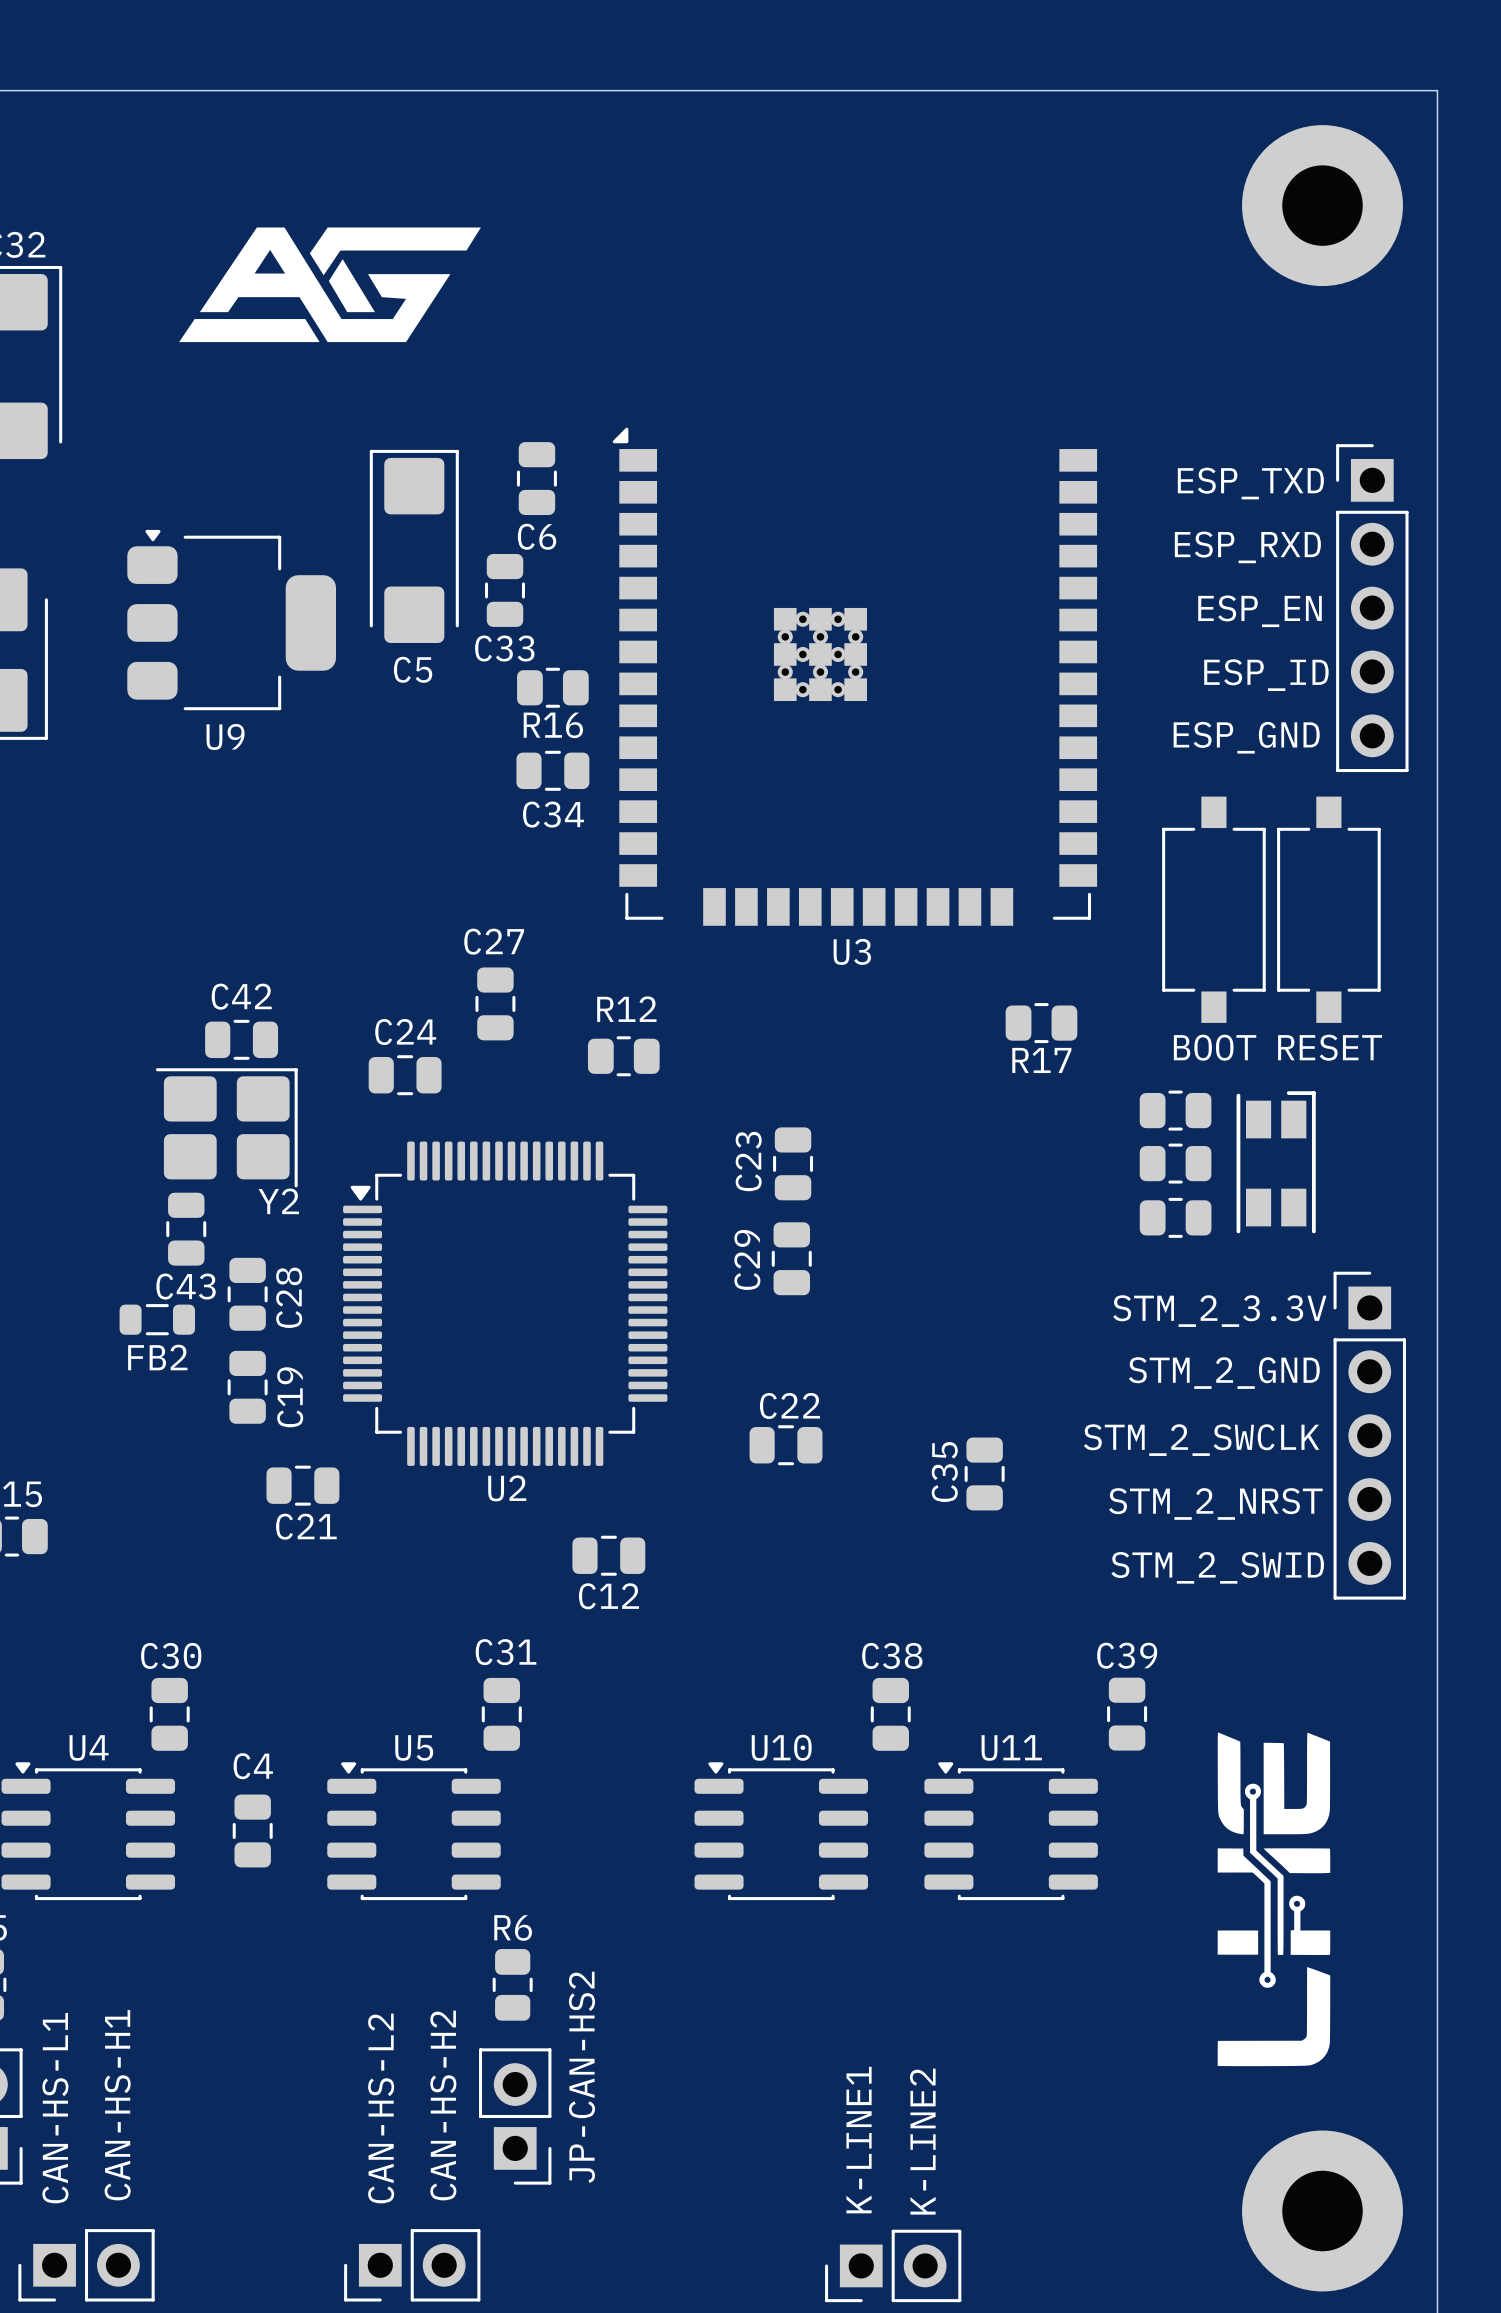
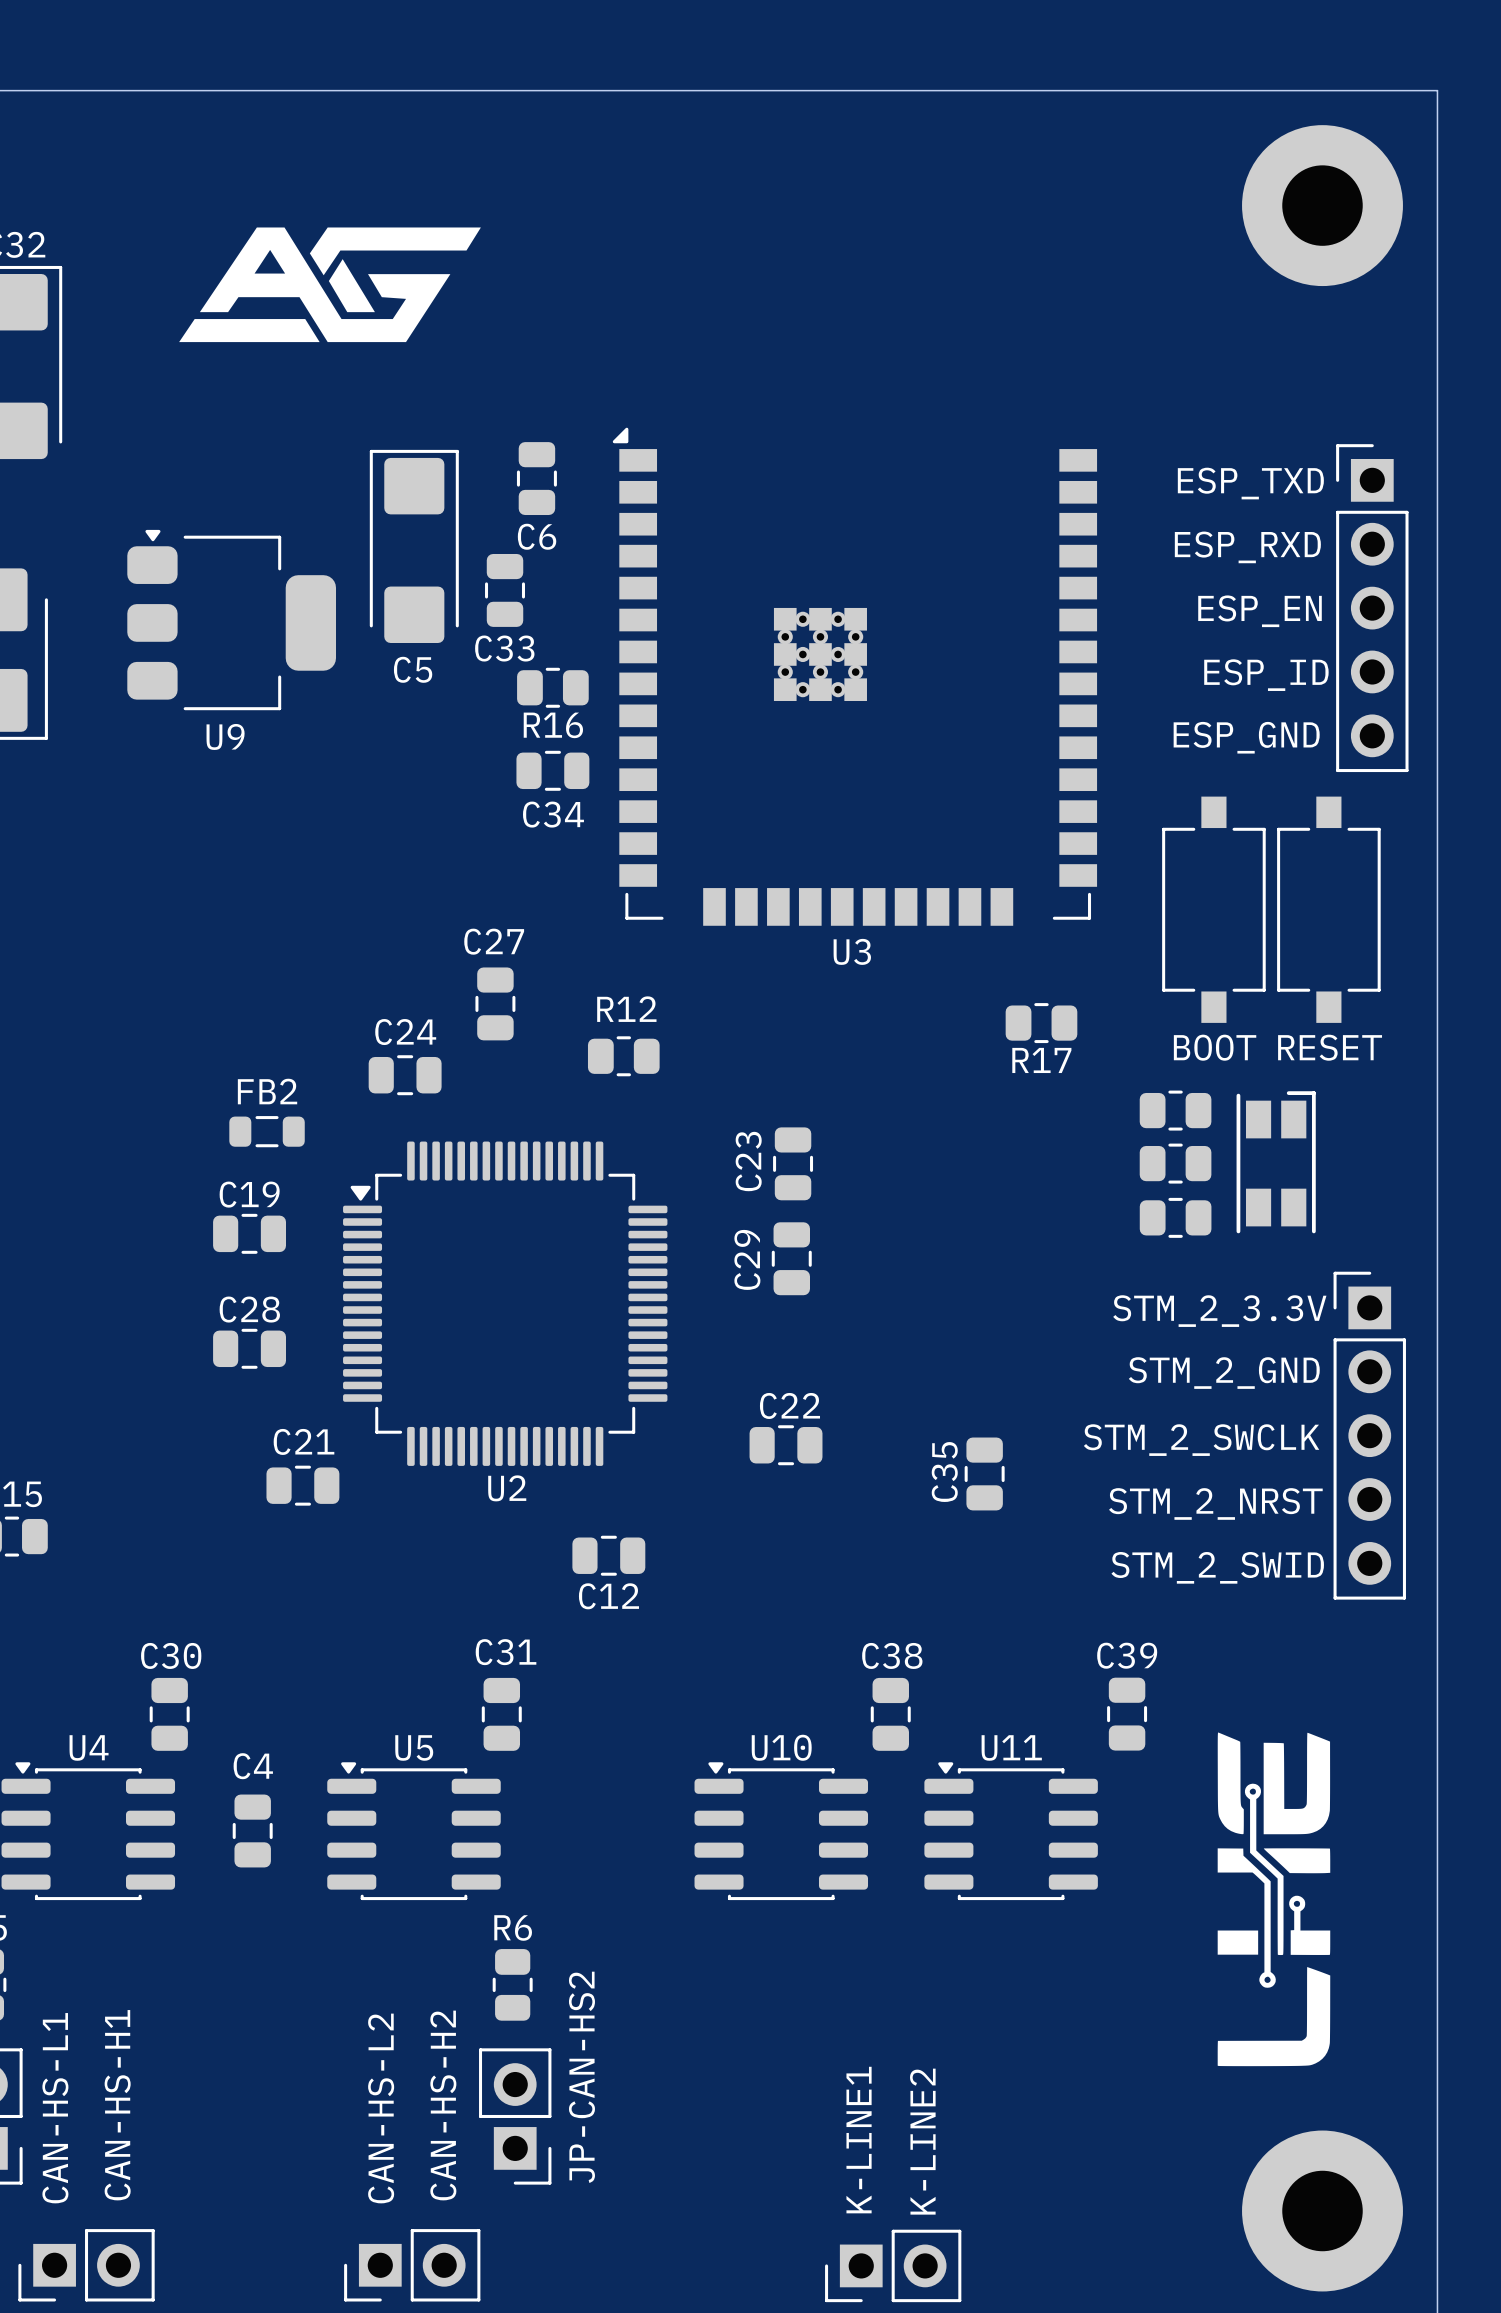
C42: (241, 1039) -> none
Y2: (226, 1127) -> none
C43: (186, 1229) -> none
C28 rotation: 0° (247, 1294) -> 90° clockwise (249, 1348)
C28 position: (247, 1294) -> (249, 1348)
C28 name position: C28 (289, 1297) -> C28 (249, 1309)
FB2 position: (157, 1319) -> (267, 1131)
FB2 name position: FB2 (157, 1357) -> FB2 (267, 1091)
C19 rotation: 0° (247, 1387) -> 90° clockwise (249, 1233)
C19 position: (247, 1387) -> (249, 1233)
C19 name position: C19 (290, 1397) -> C19 (249, 1194)
C21 name position: C21 (306, 1526) -> C21 (304, 1441)

